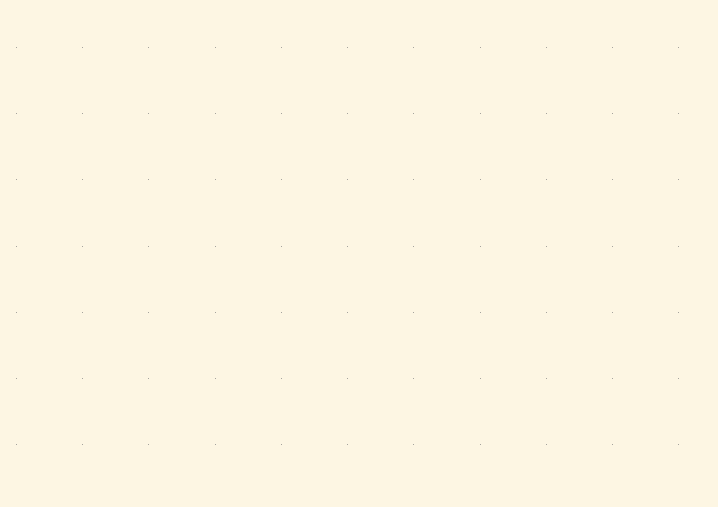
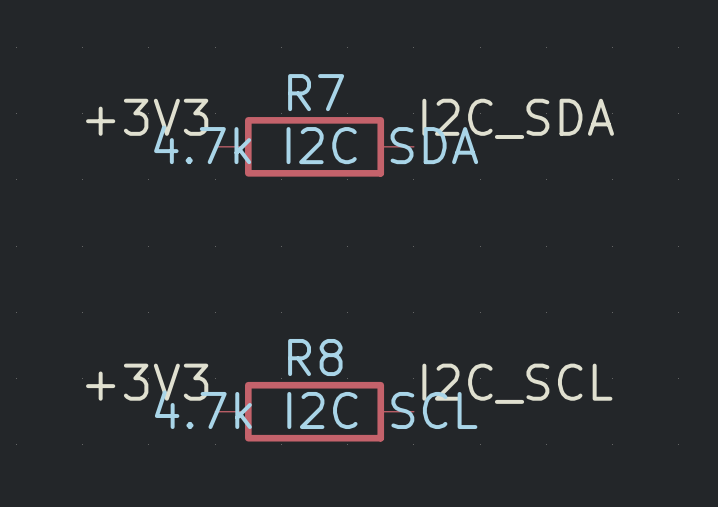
label: none -> +3V3 (147, 117)
label: none -> I2C_SDA (518, 118)
R7: none -> 4.7k I2C SDA (314, 146)
label: none -> +3V3 (147, 382)
label: none -> I2C_SCL (517, 383)
R8: none -> 4.7k I2C SCL (314, 411)

